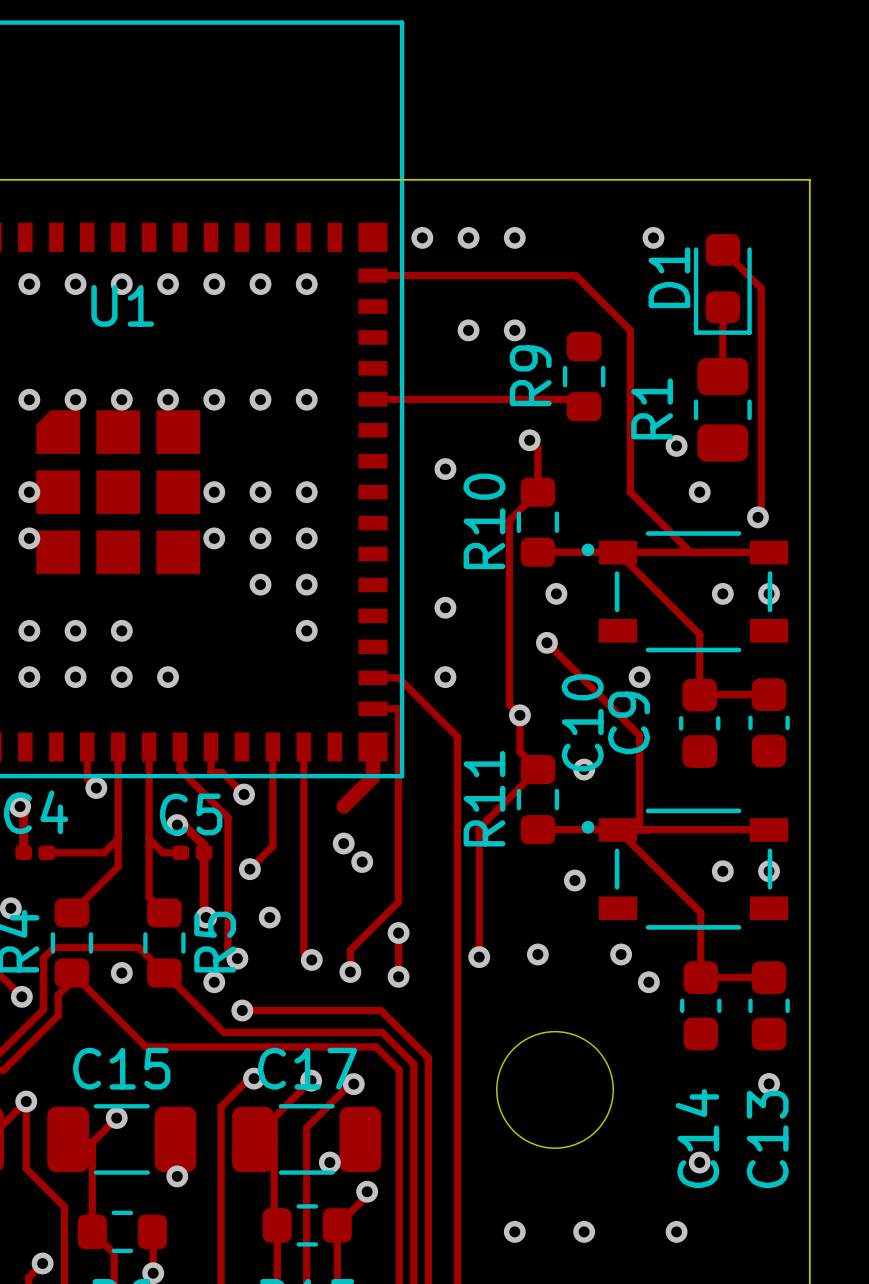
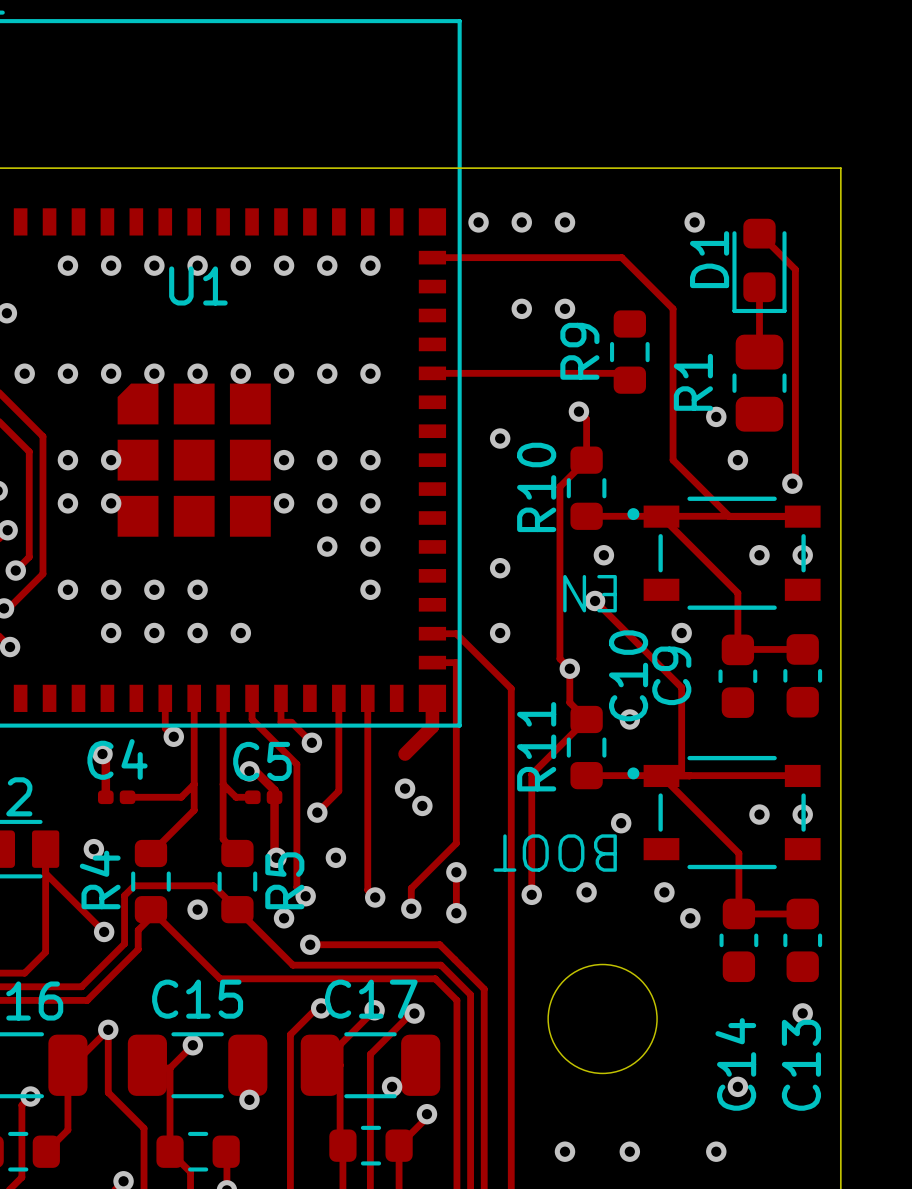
text: none -> EN (590, 593)
text: none -> BOOT (555, 853)

